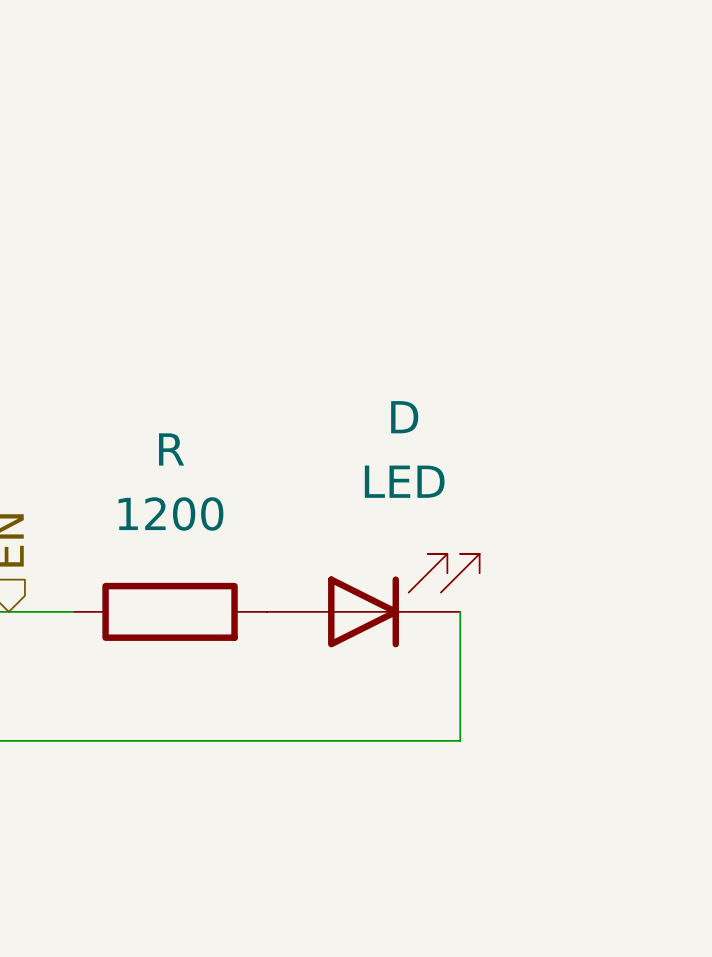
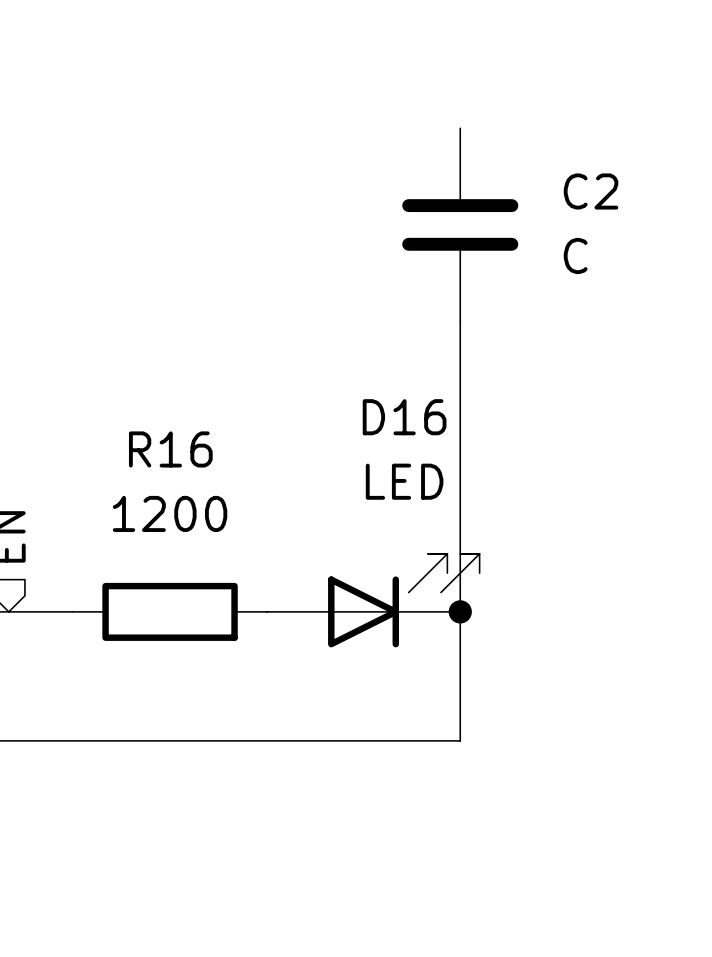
C2: none -> C (460, 224)
wire: none -> (460, 321) (460, 611)
D name: D (404, 417) -> D16 (404, 417)
R name: R (171, 449) -> R16 (170, 449)
junction: none -> (460, 611)

